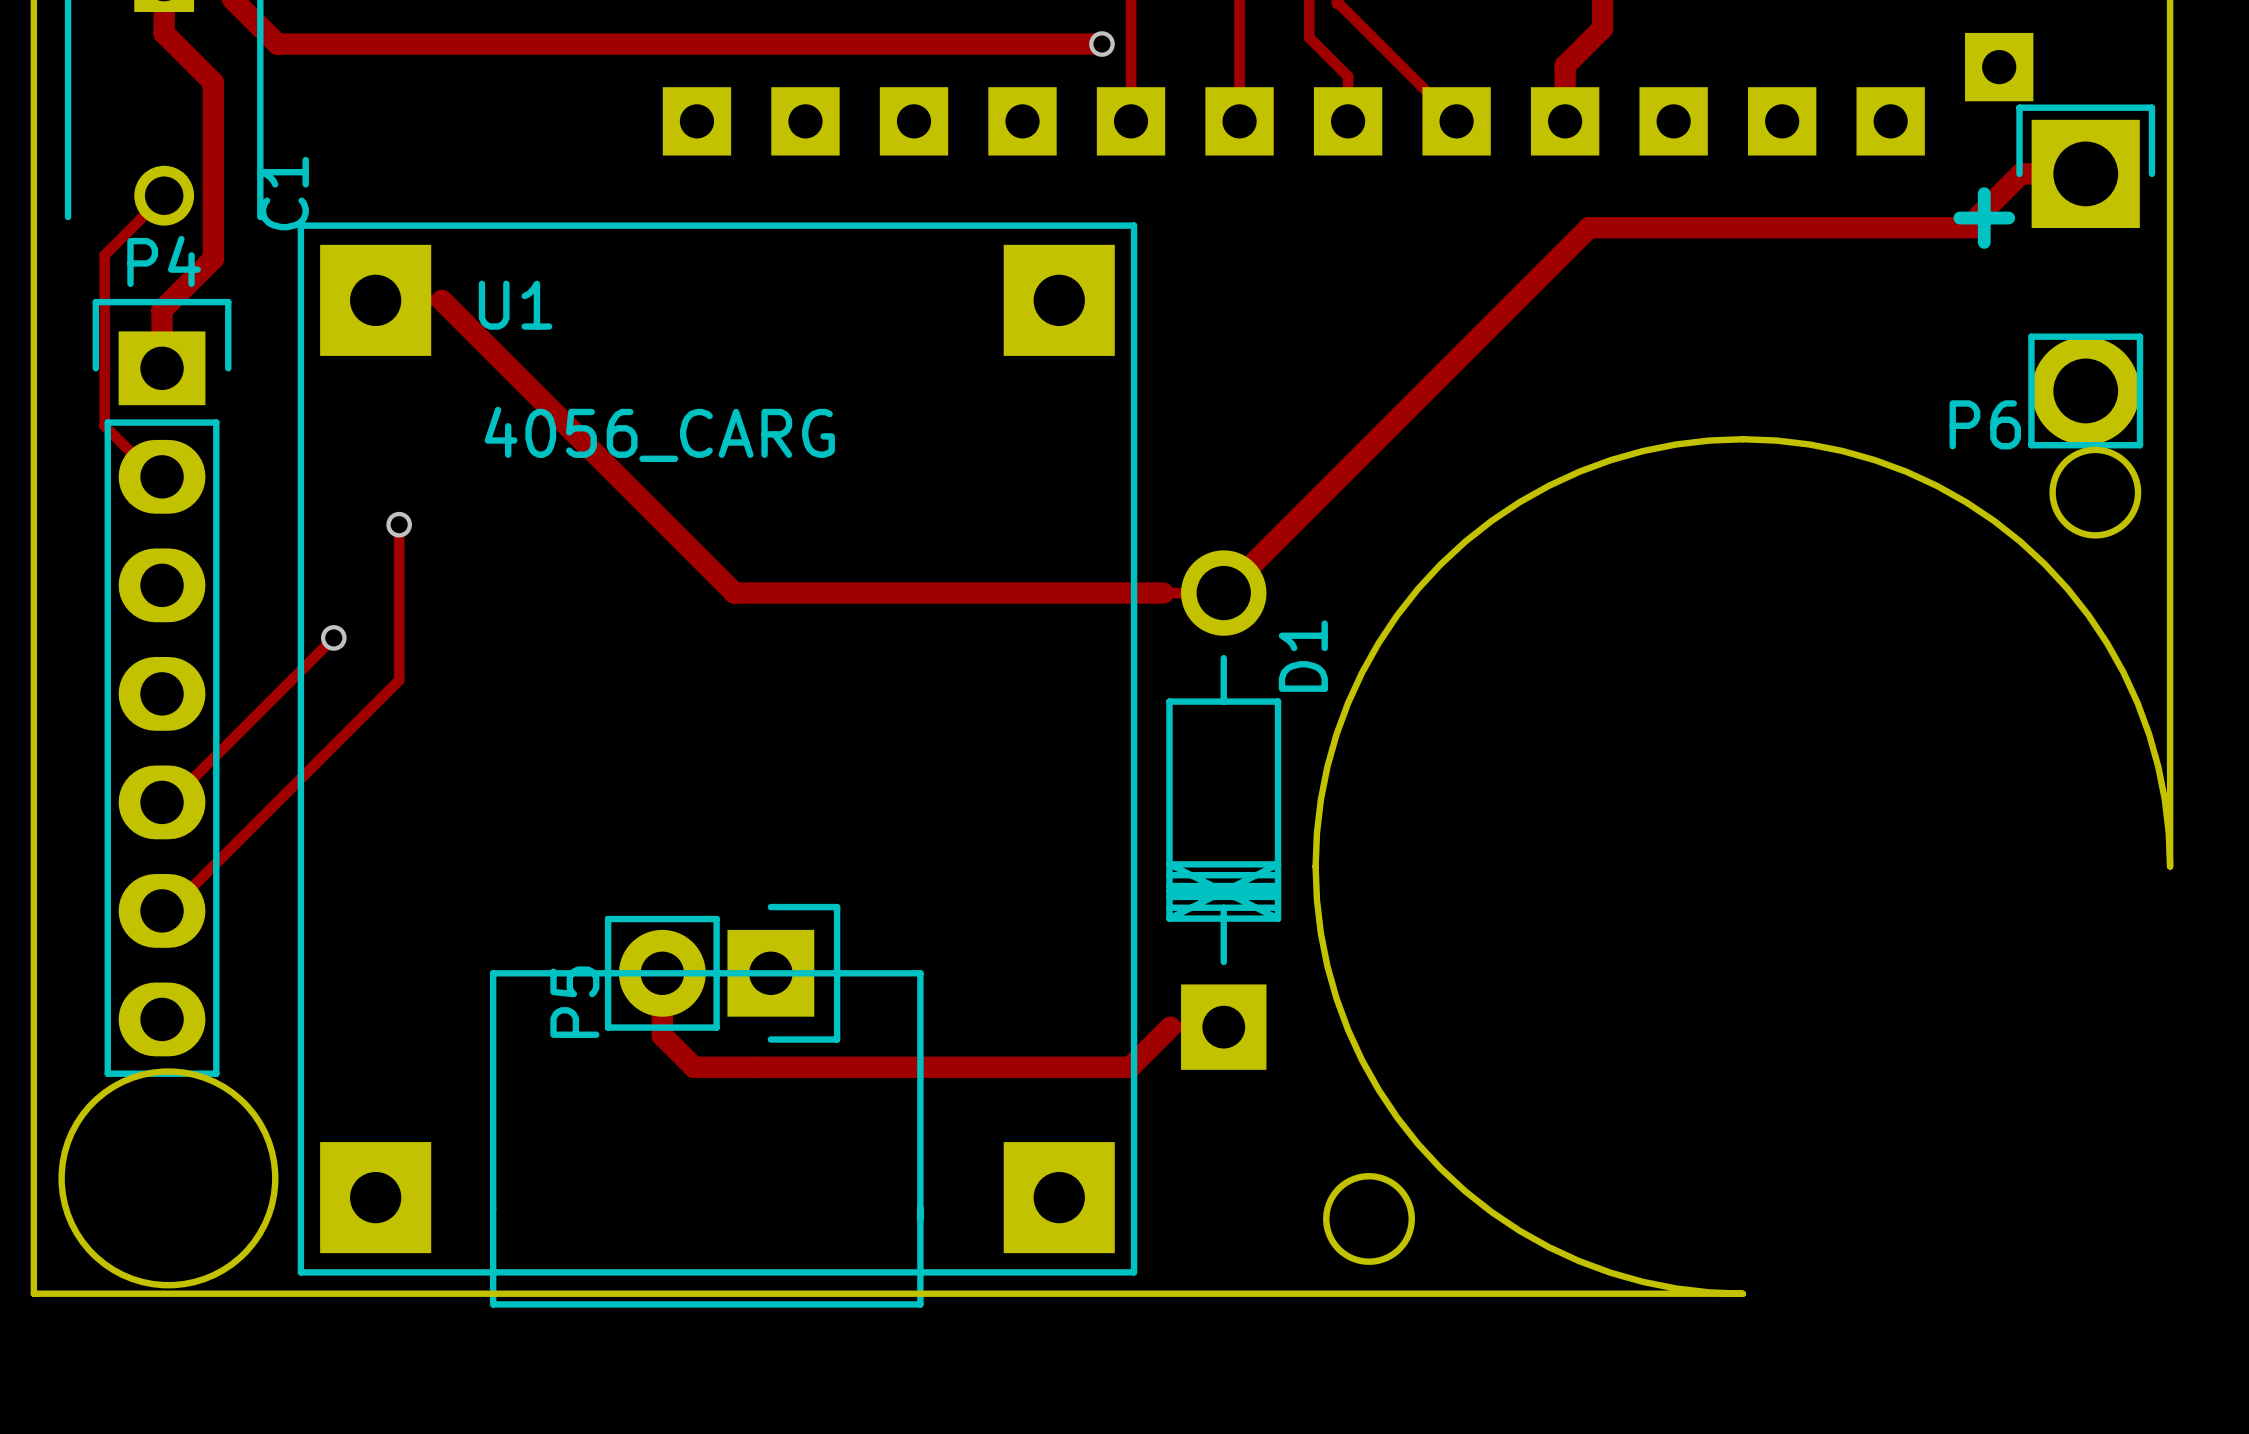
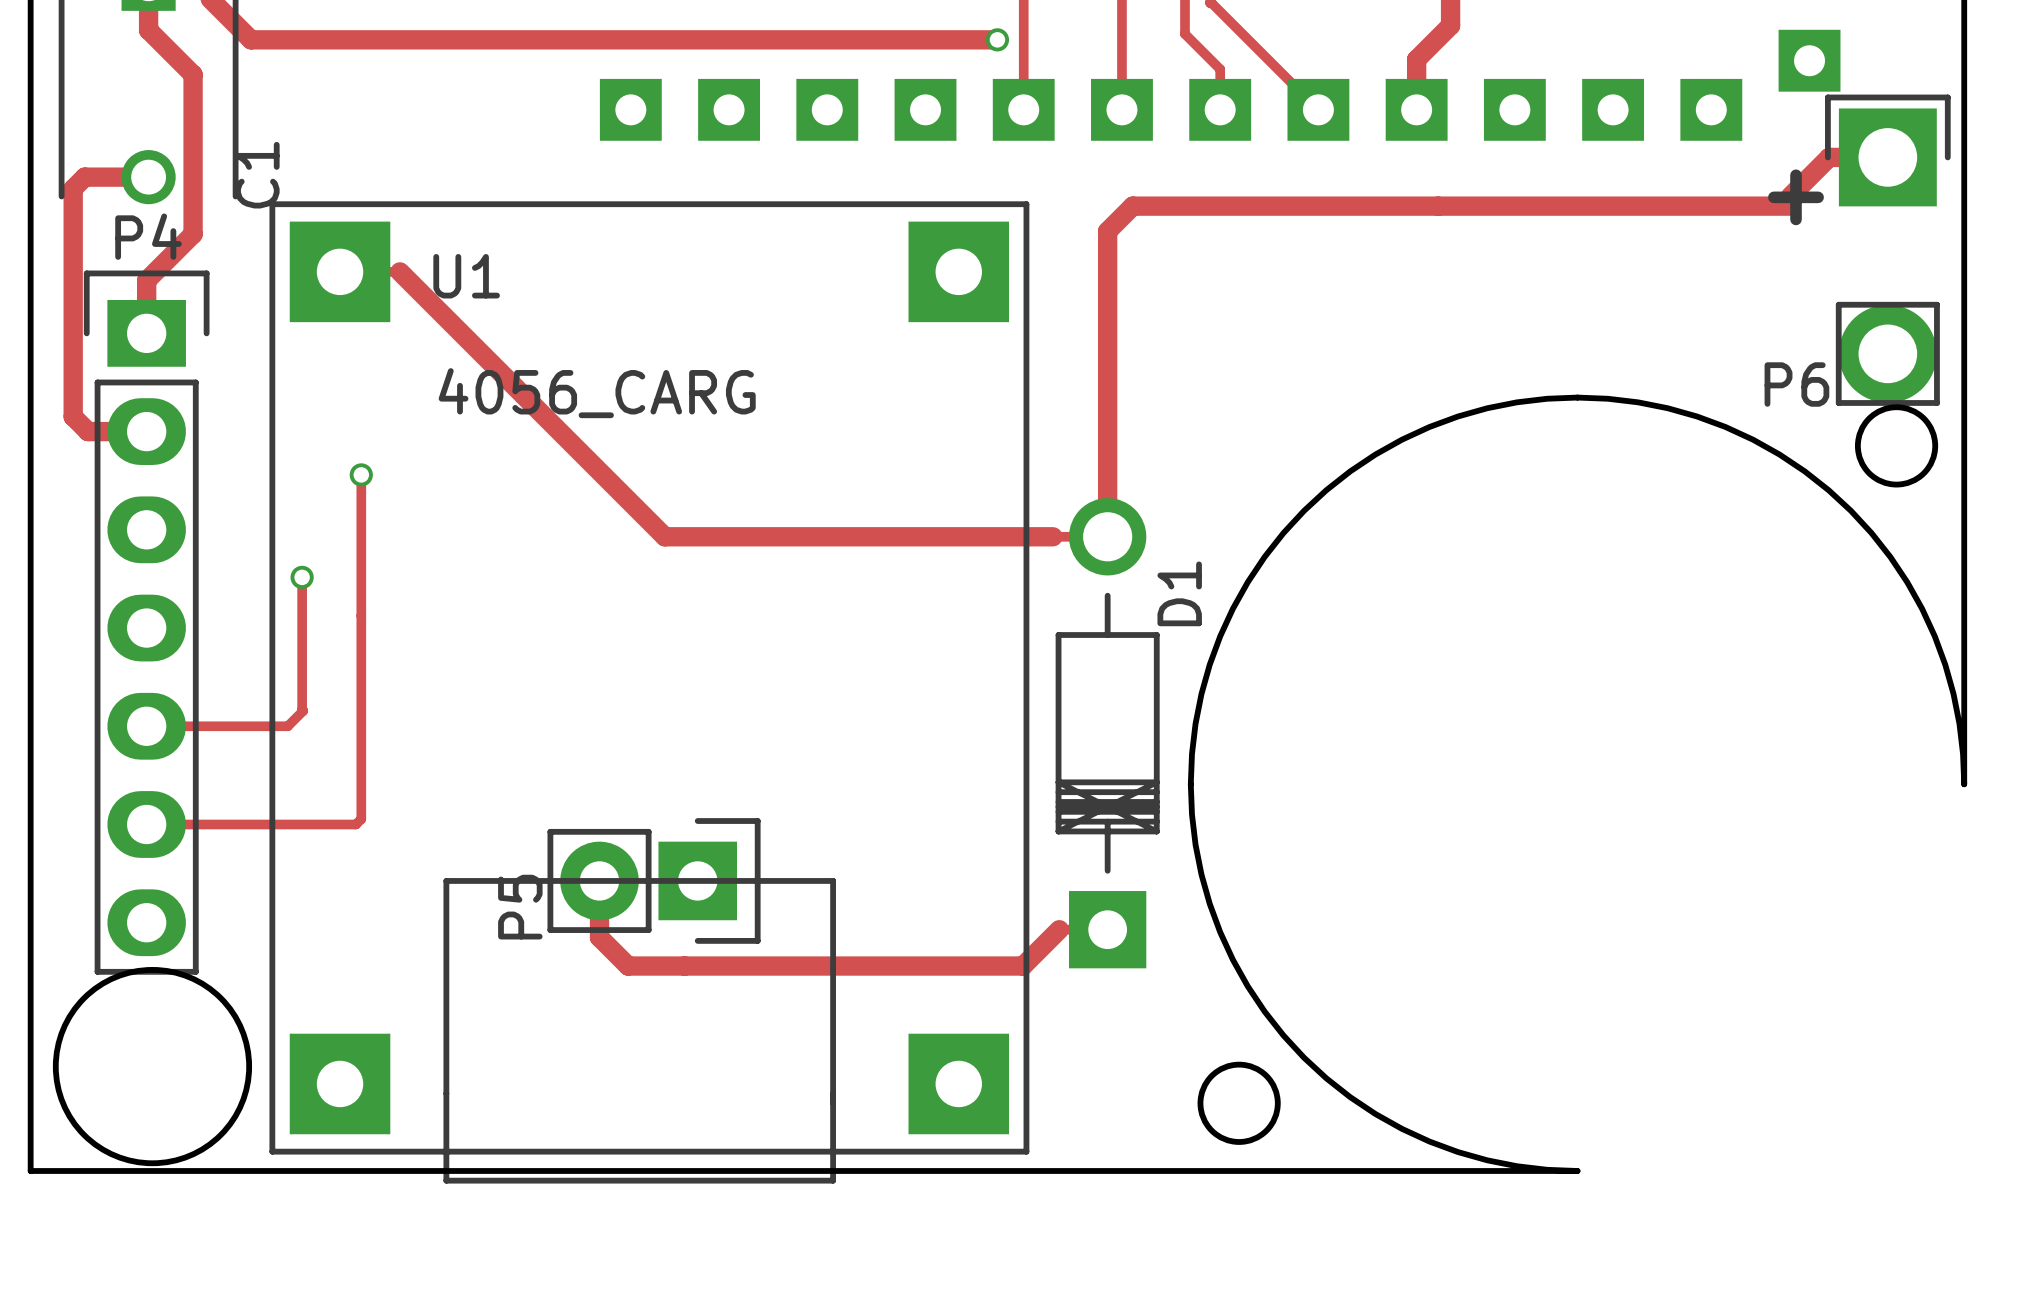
track: (164, 195) (104, 255) (104, 426) (155, 476) -> (148, 177) (84, 177) (73, 188) (73, 416) (88, 431) (140, 431)
track: (1589, 227) (1223, 593) -> (1438, 206) (1132, 206) (1107, 231) (1107, 536)
track: (333, 637) (169, 802) -> (302, 577) (303, 710) (287, 726) (153, 726)
track: (399, 680) (168, 910) -> (361, 615) (361, 819) (355, 824) (152, 824)

